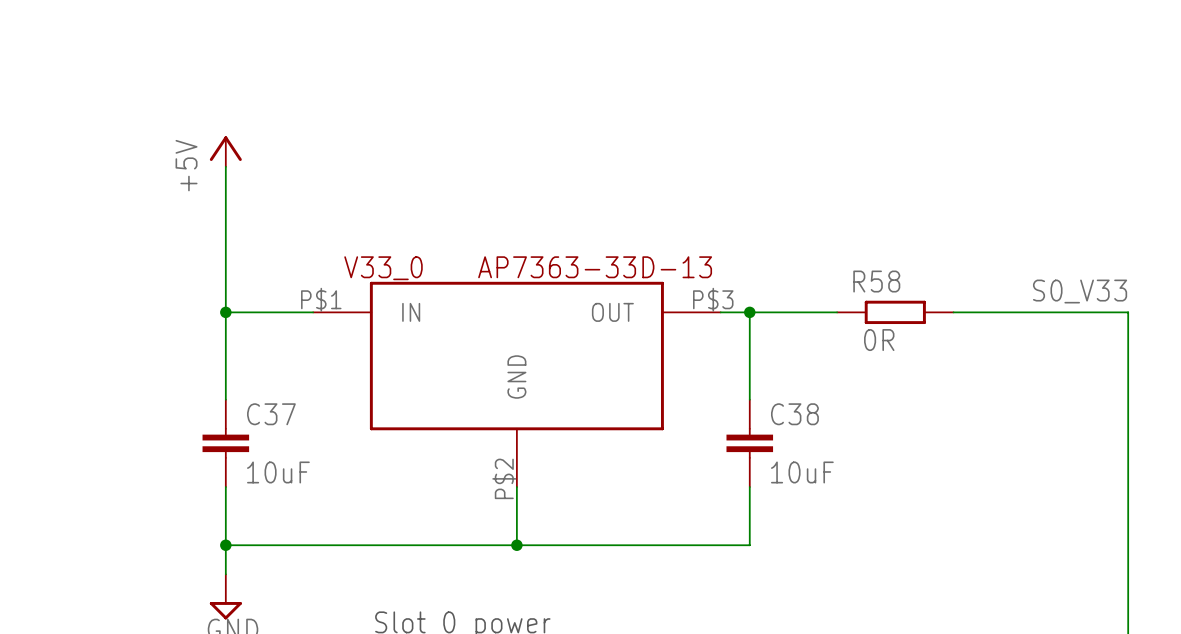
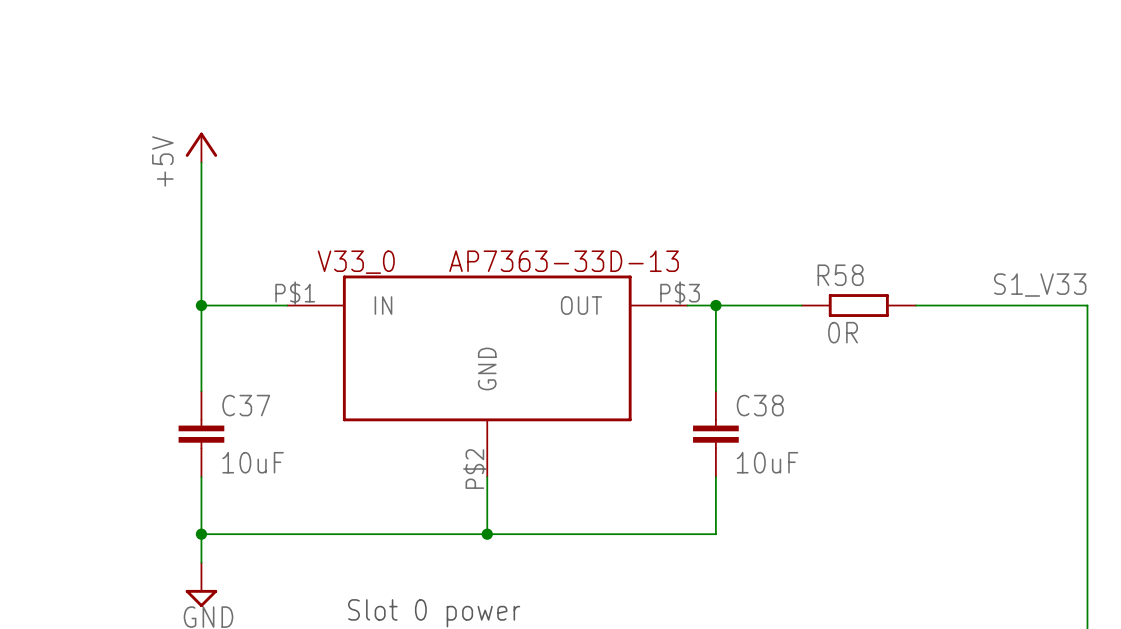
label: S0_V33 (1080, 291) -> S1_V33 (1040, 285)

